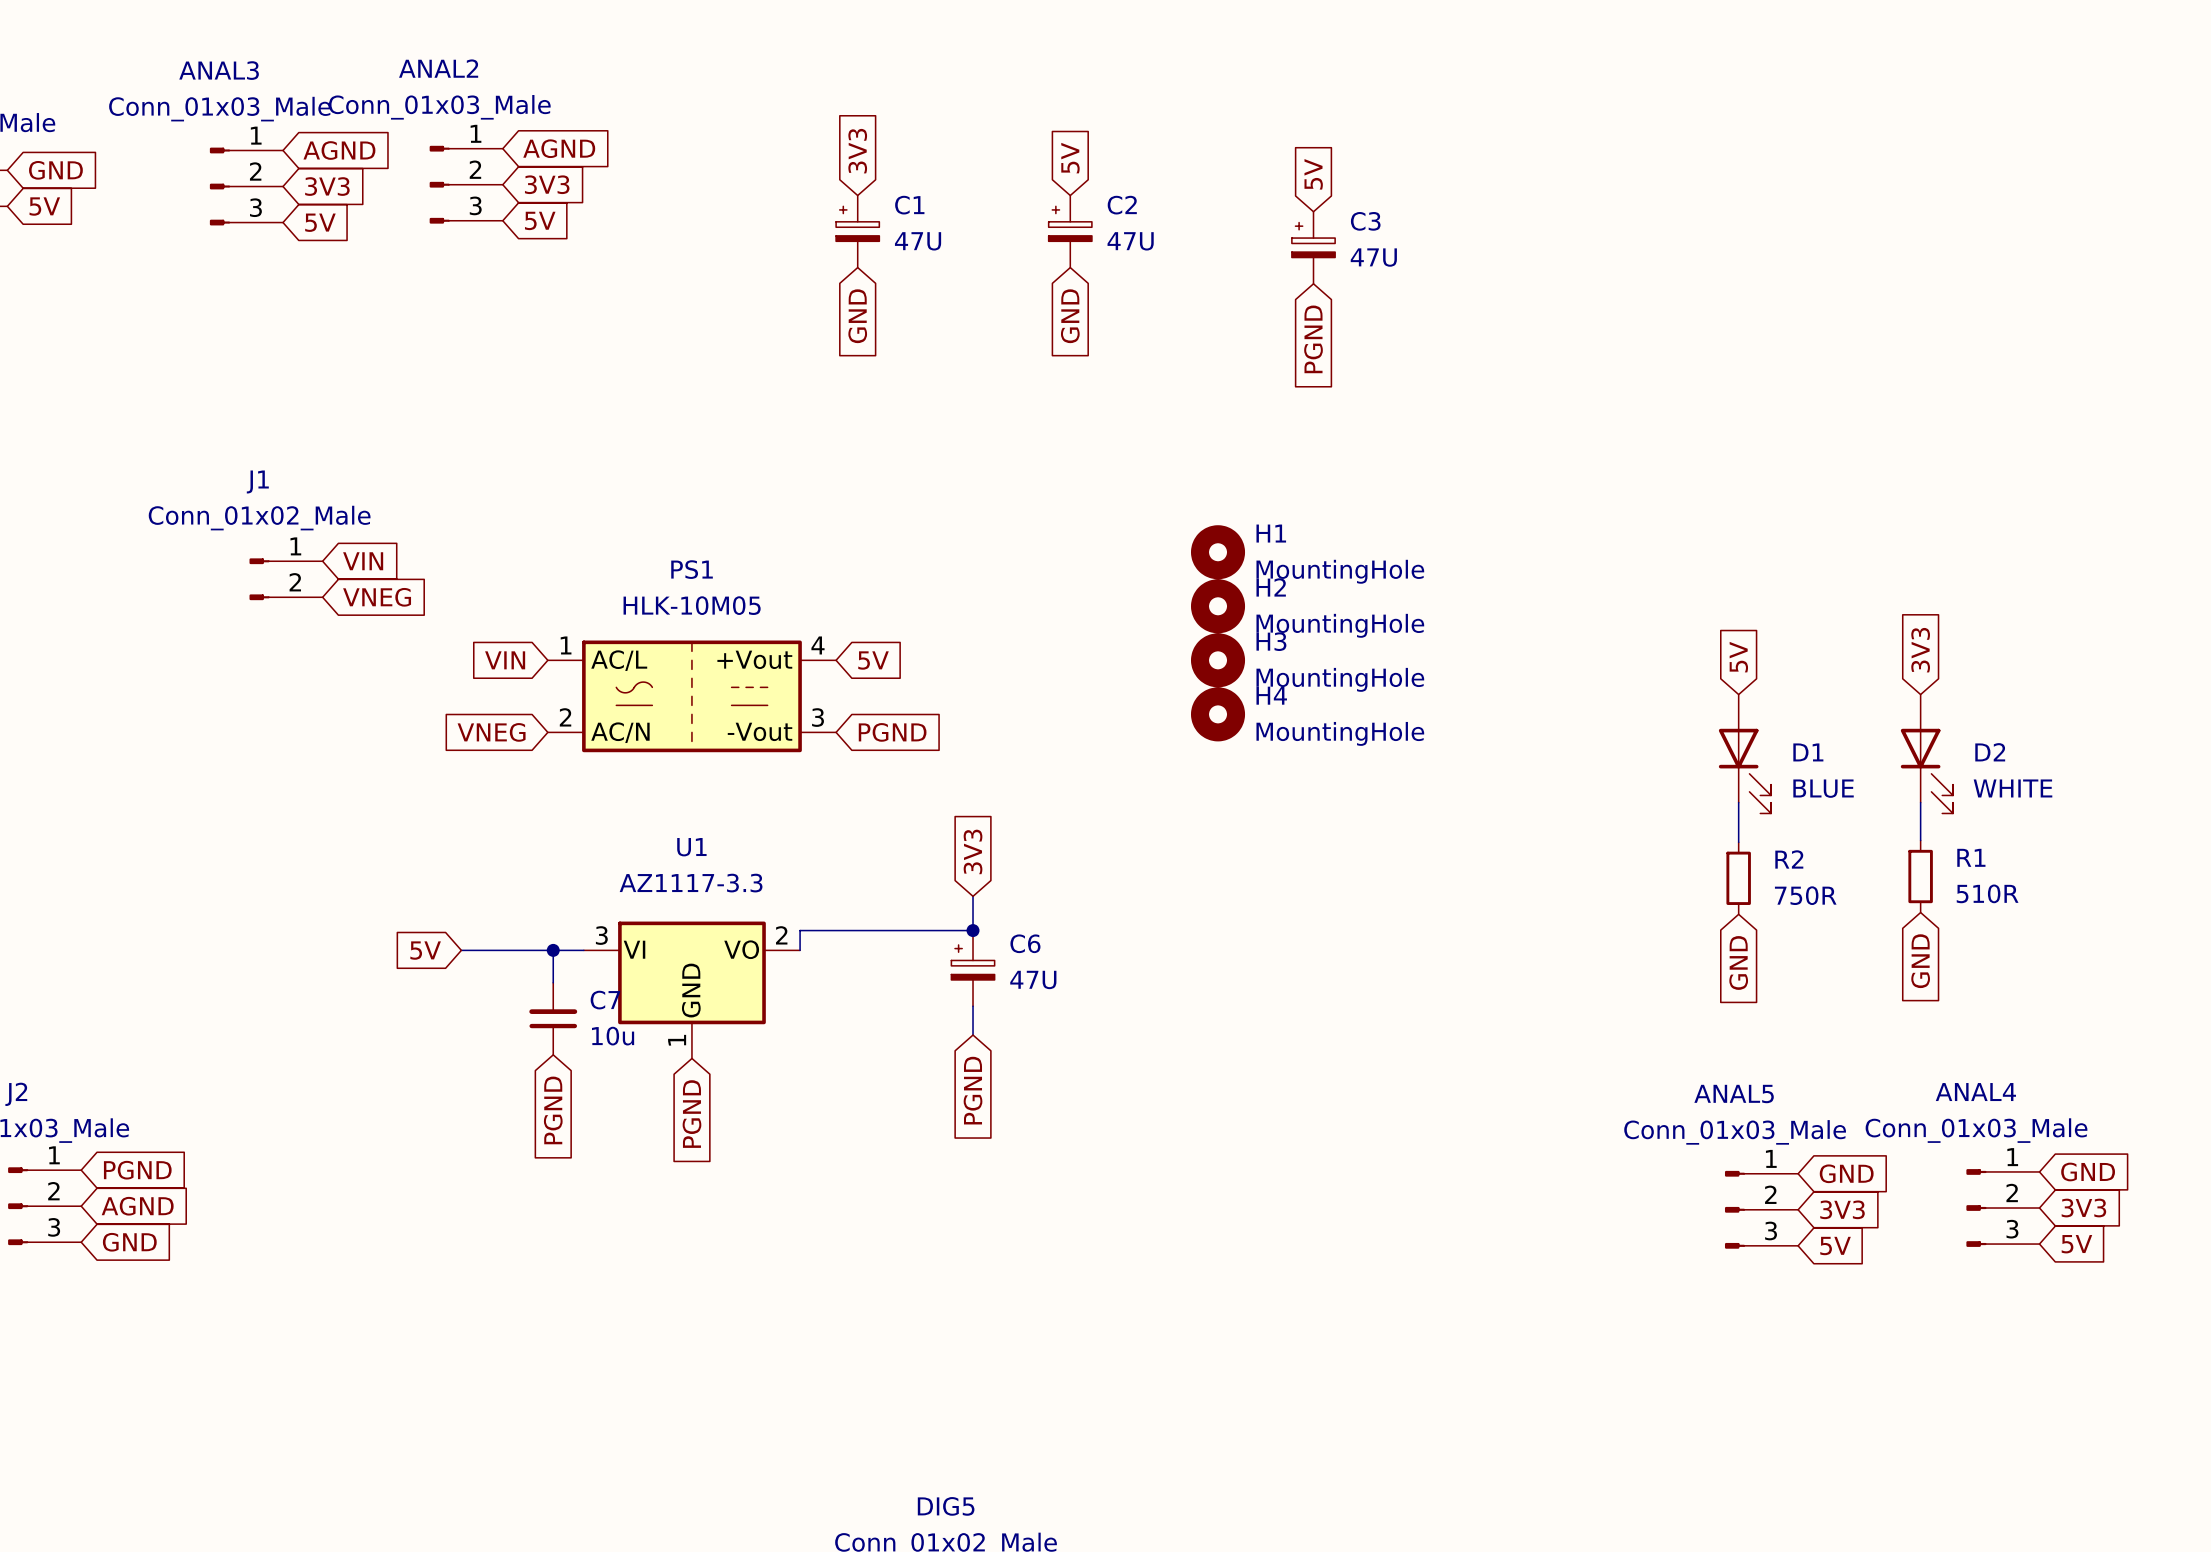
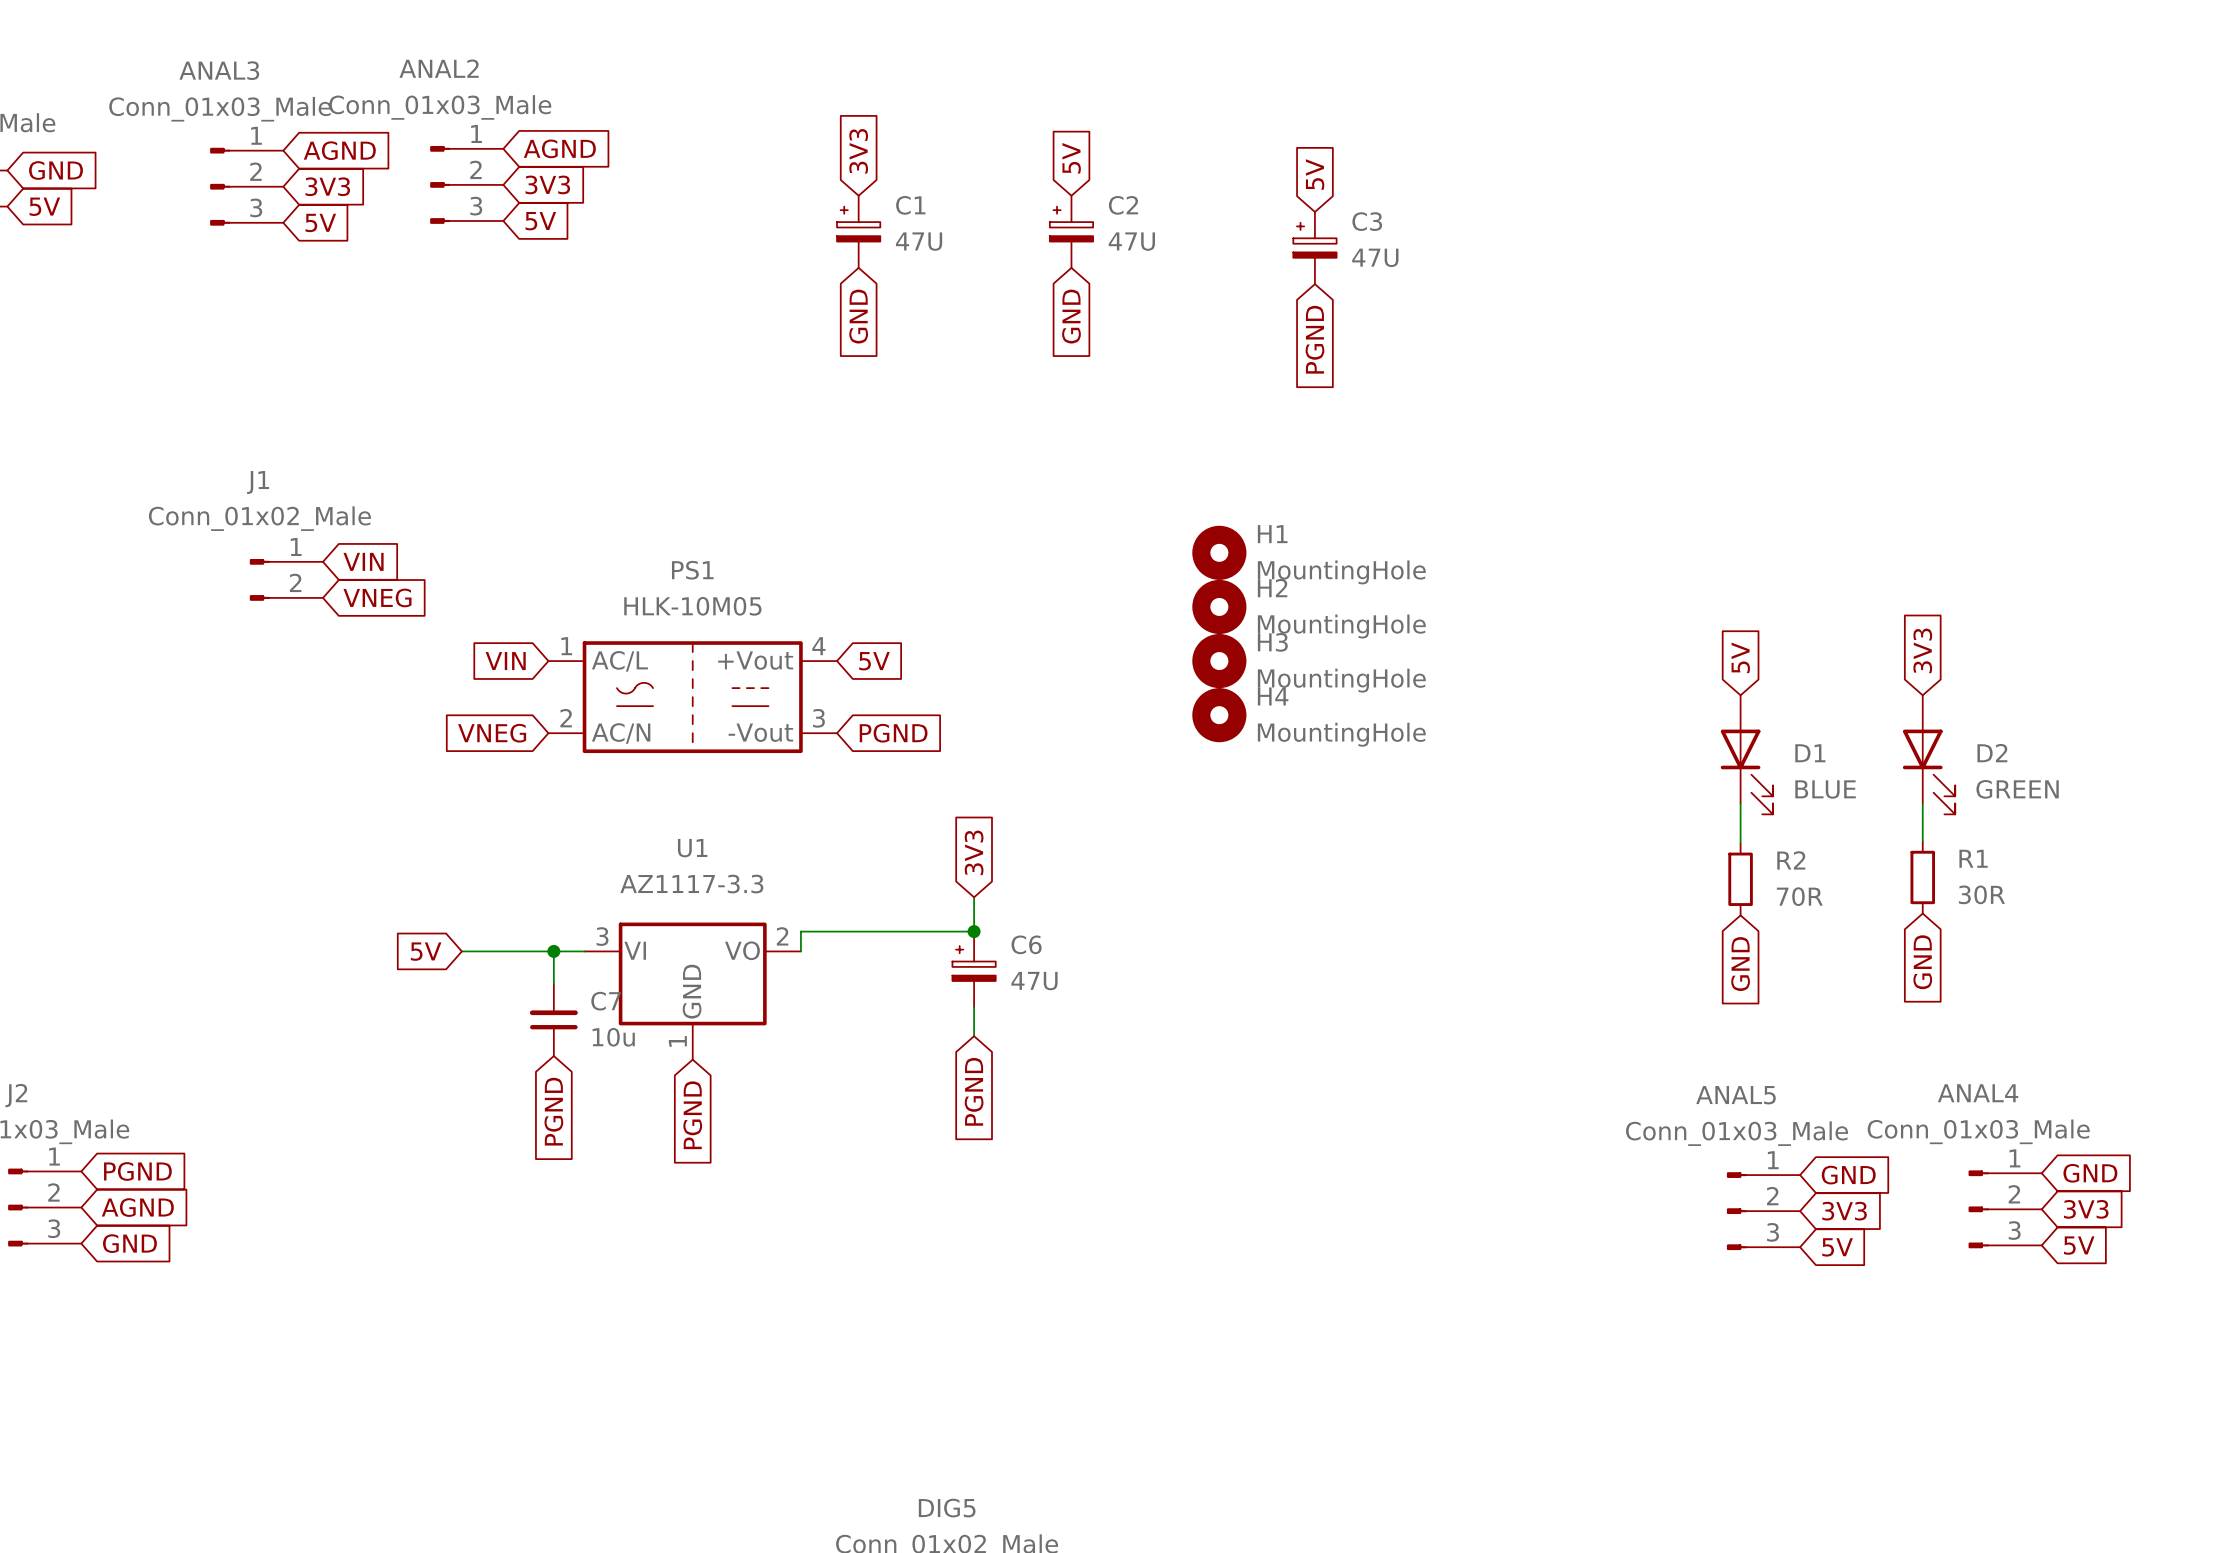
D2 value: WHITE (2012, 788) -> GREEN (2017, 789)
R1 value: 510R (1987, 893) -> 30R (1981, 894)
R2 value: 750R (1805, 895) -> 70R (1799, 896)

